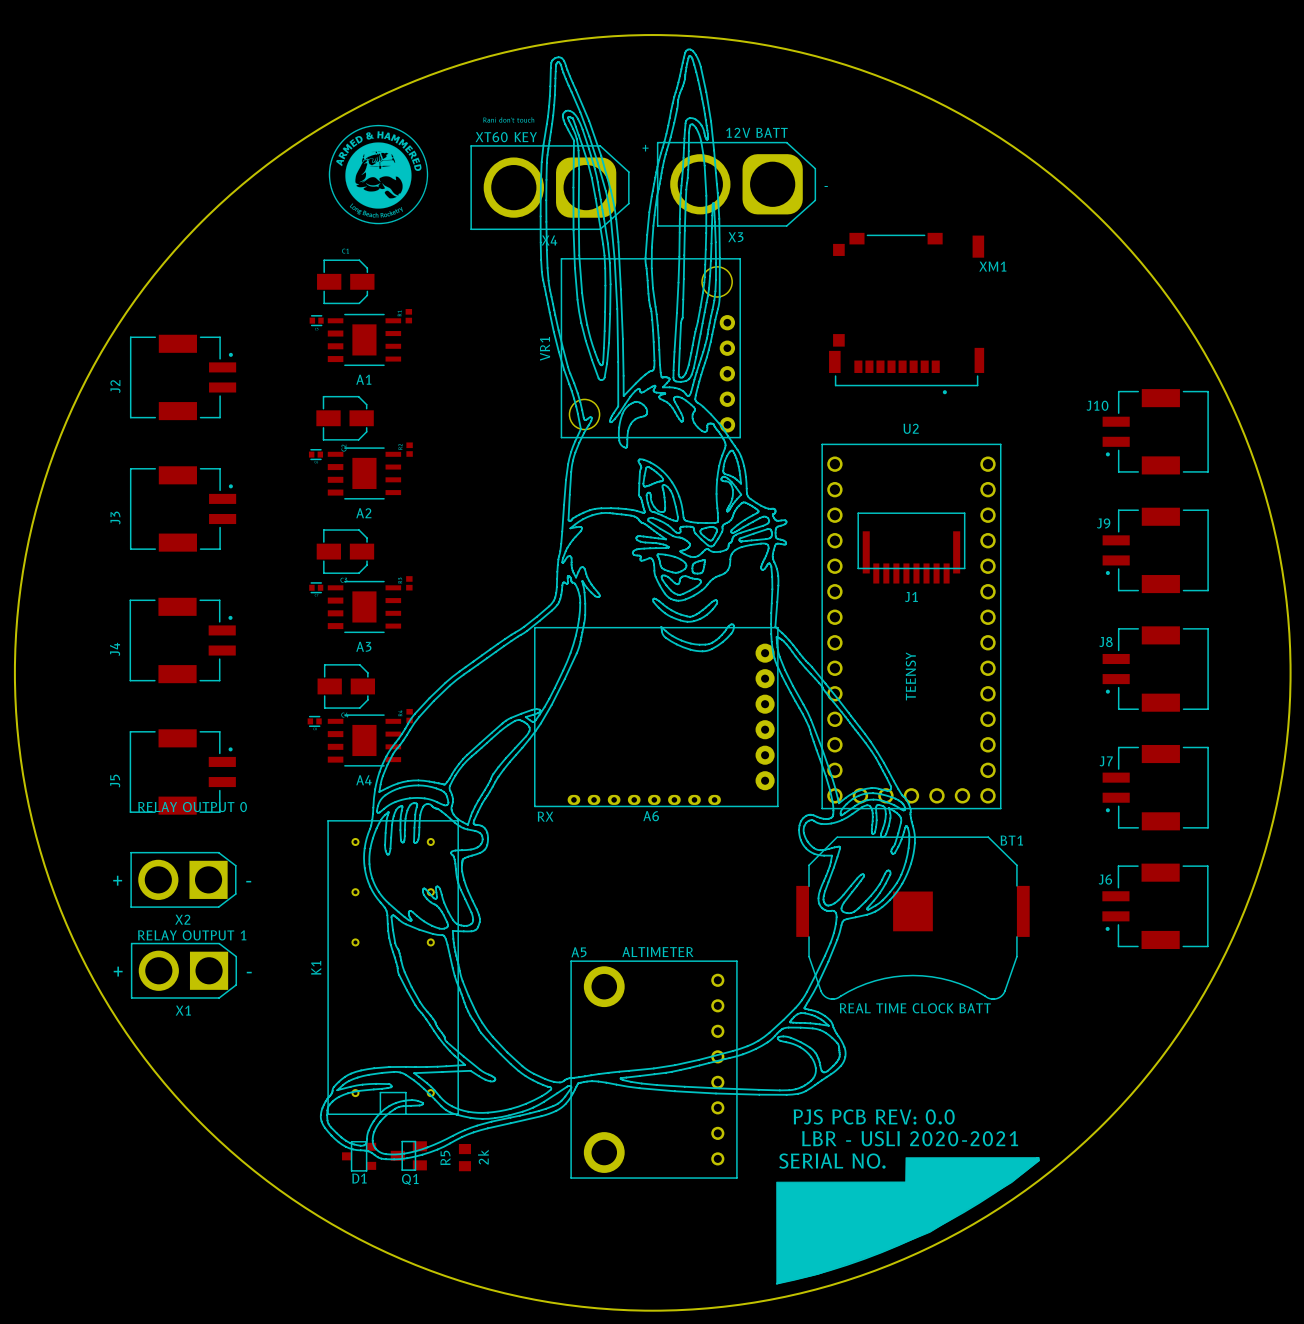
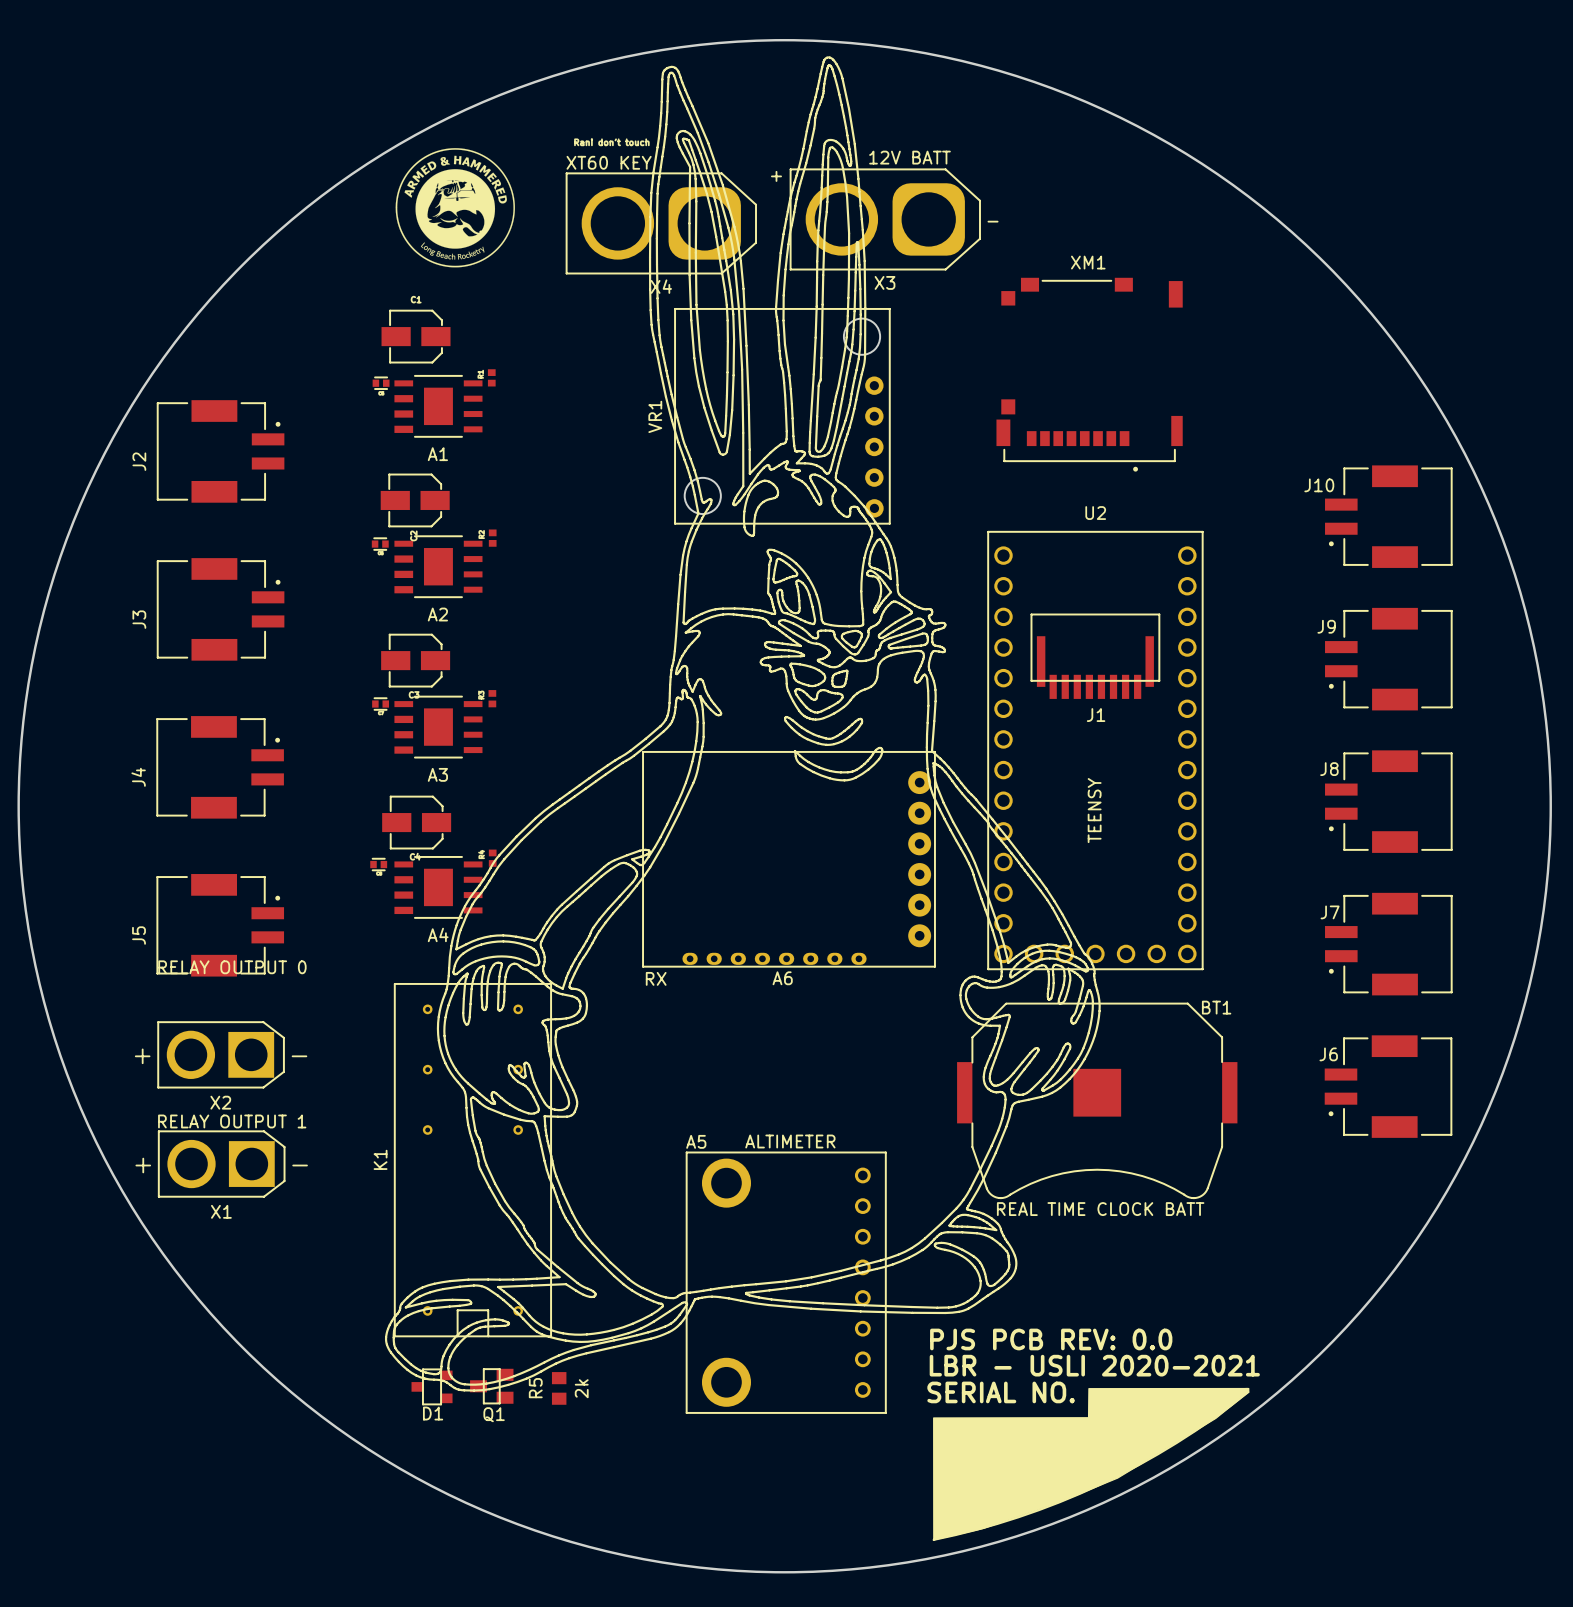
XM1 name position: XM1 (992, 266) -> XM1 (1088, 262)

